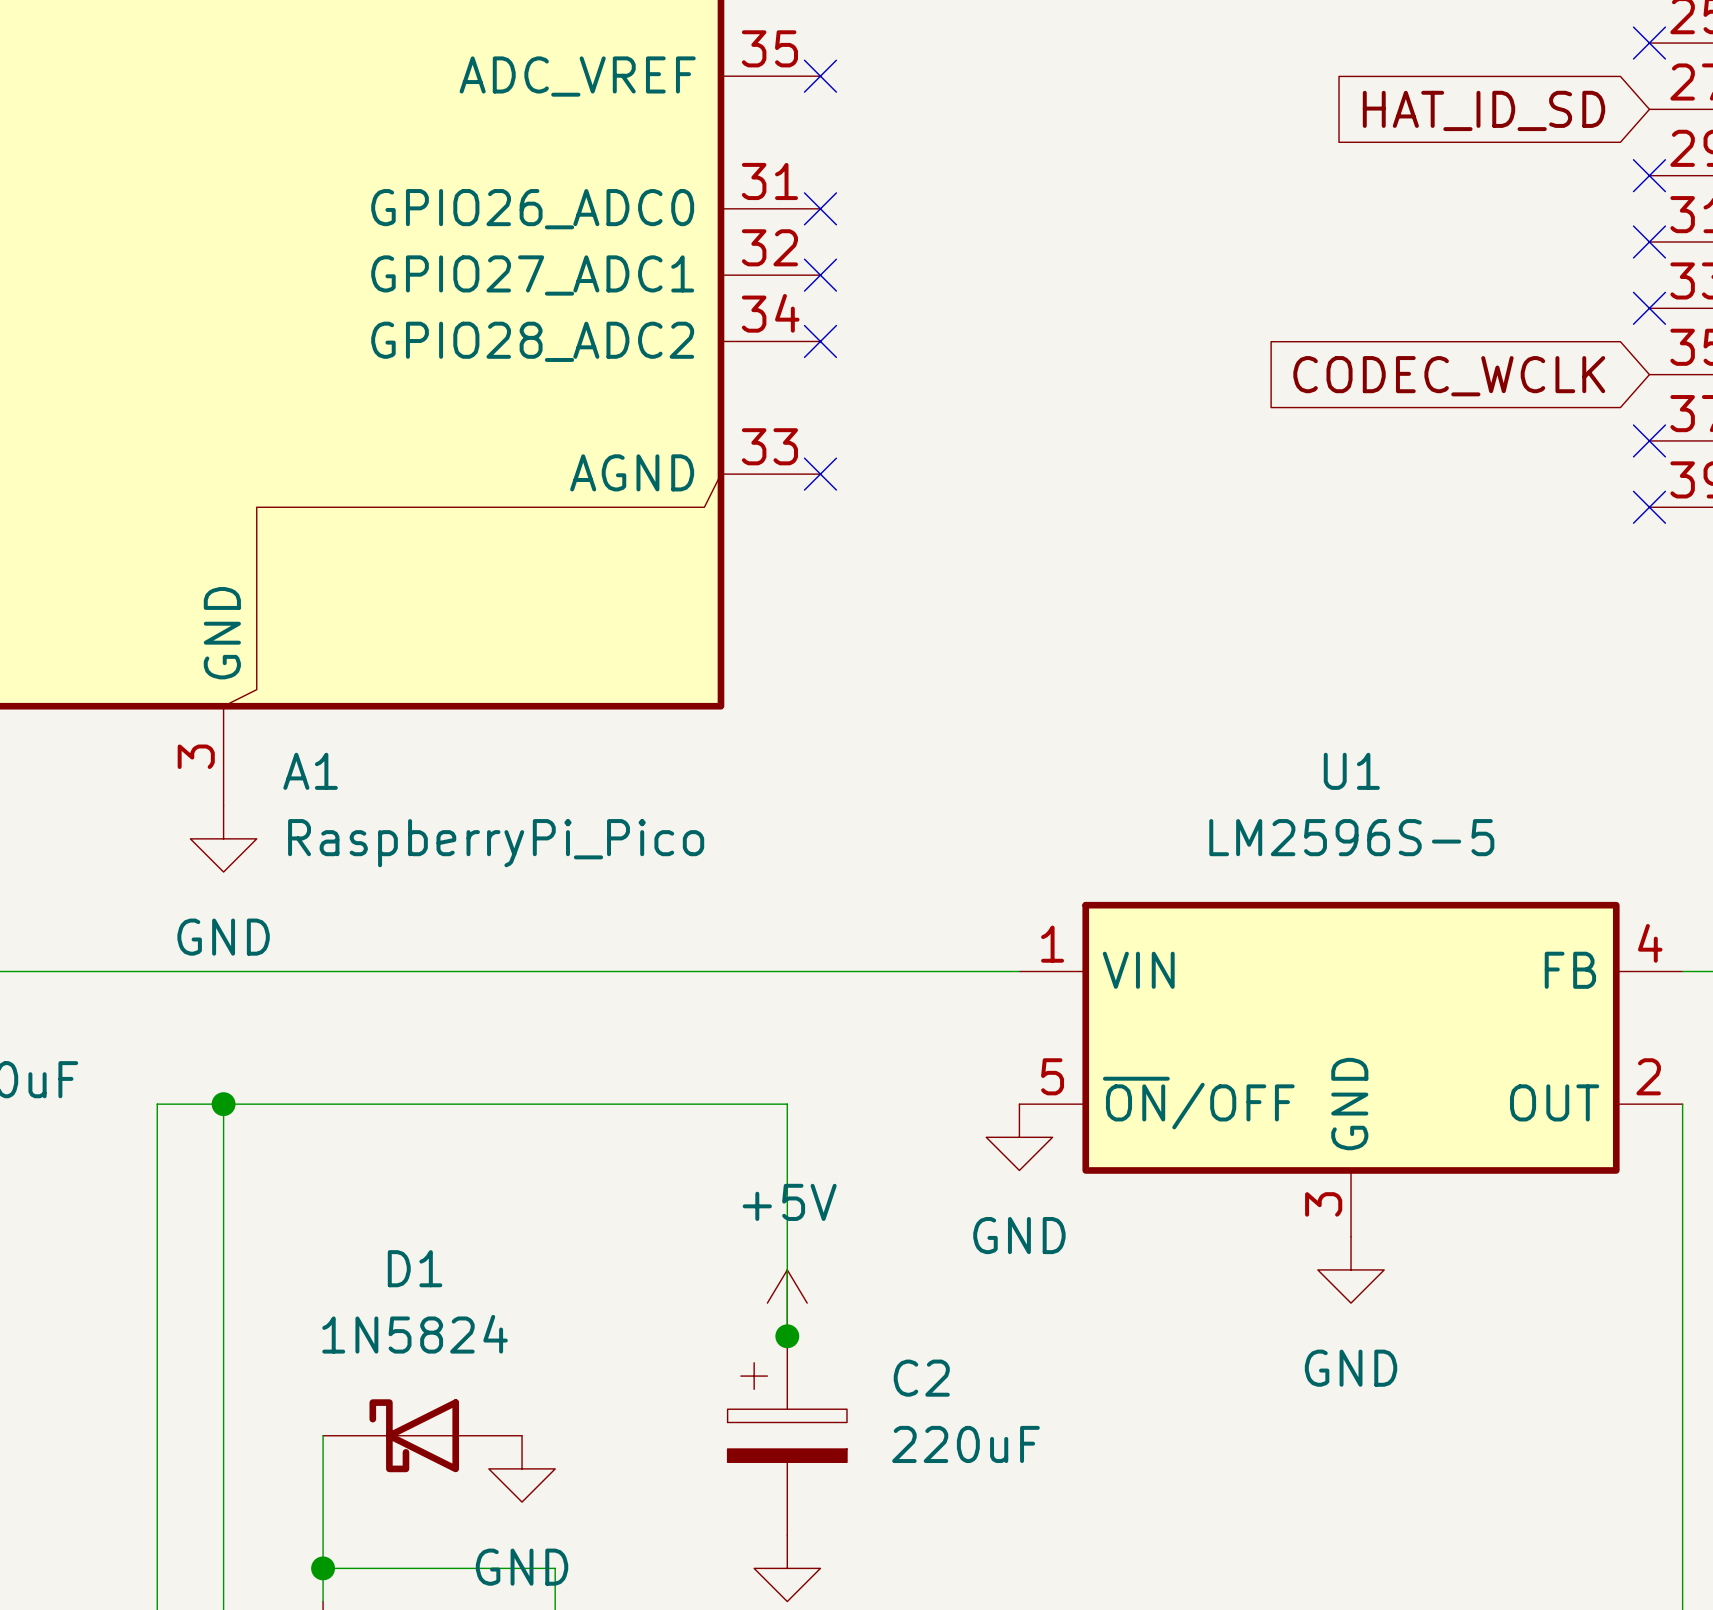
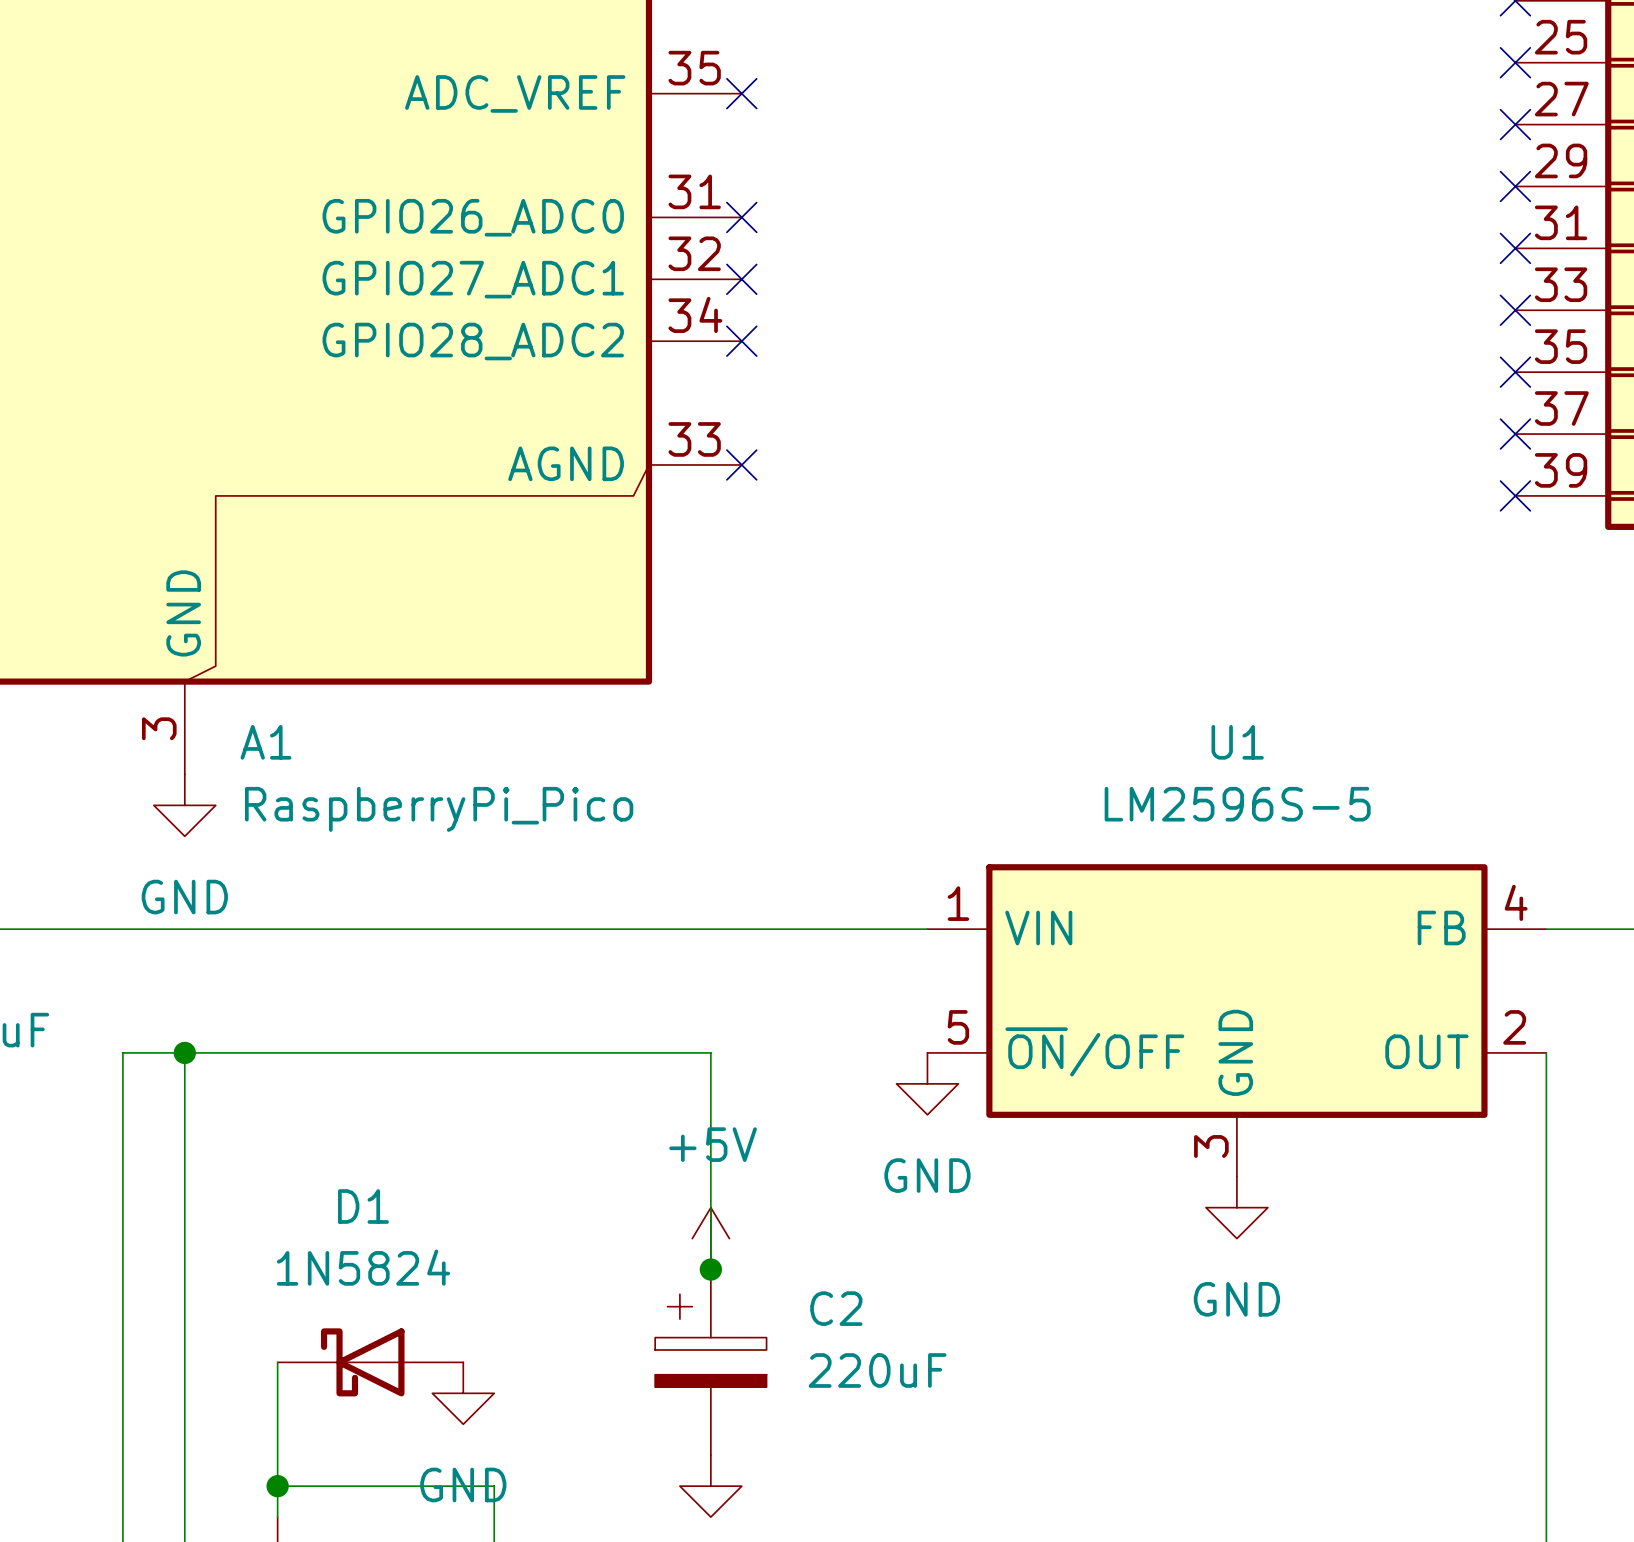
no-connect mark: none -> (1515, 124)
global label: HAT_ID_SD (1484, 110) -> none
no-connect mark: none -> (1515, 372)
global label: CODEC_WCLK (1449, 376) -> none

